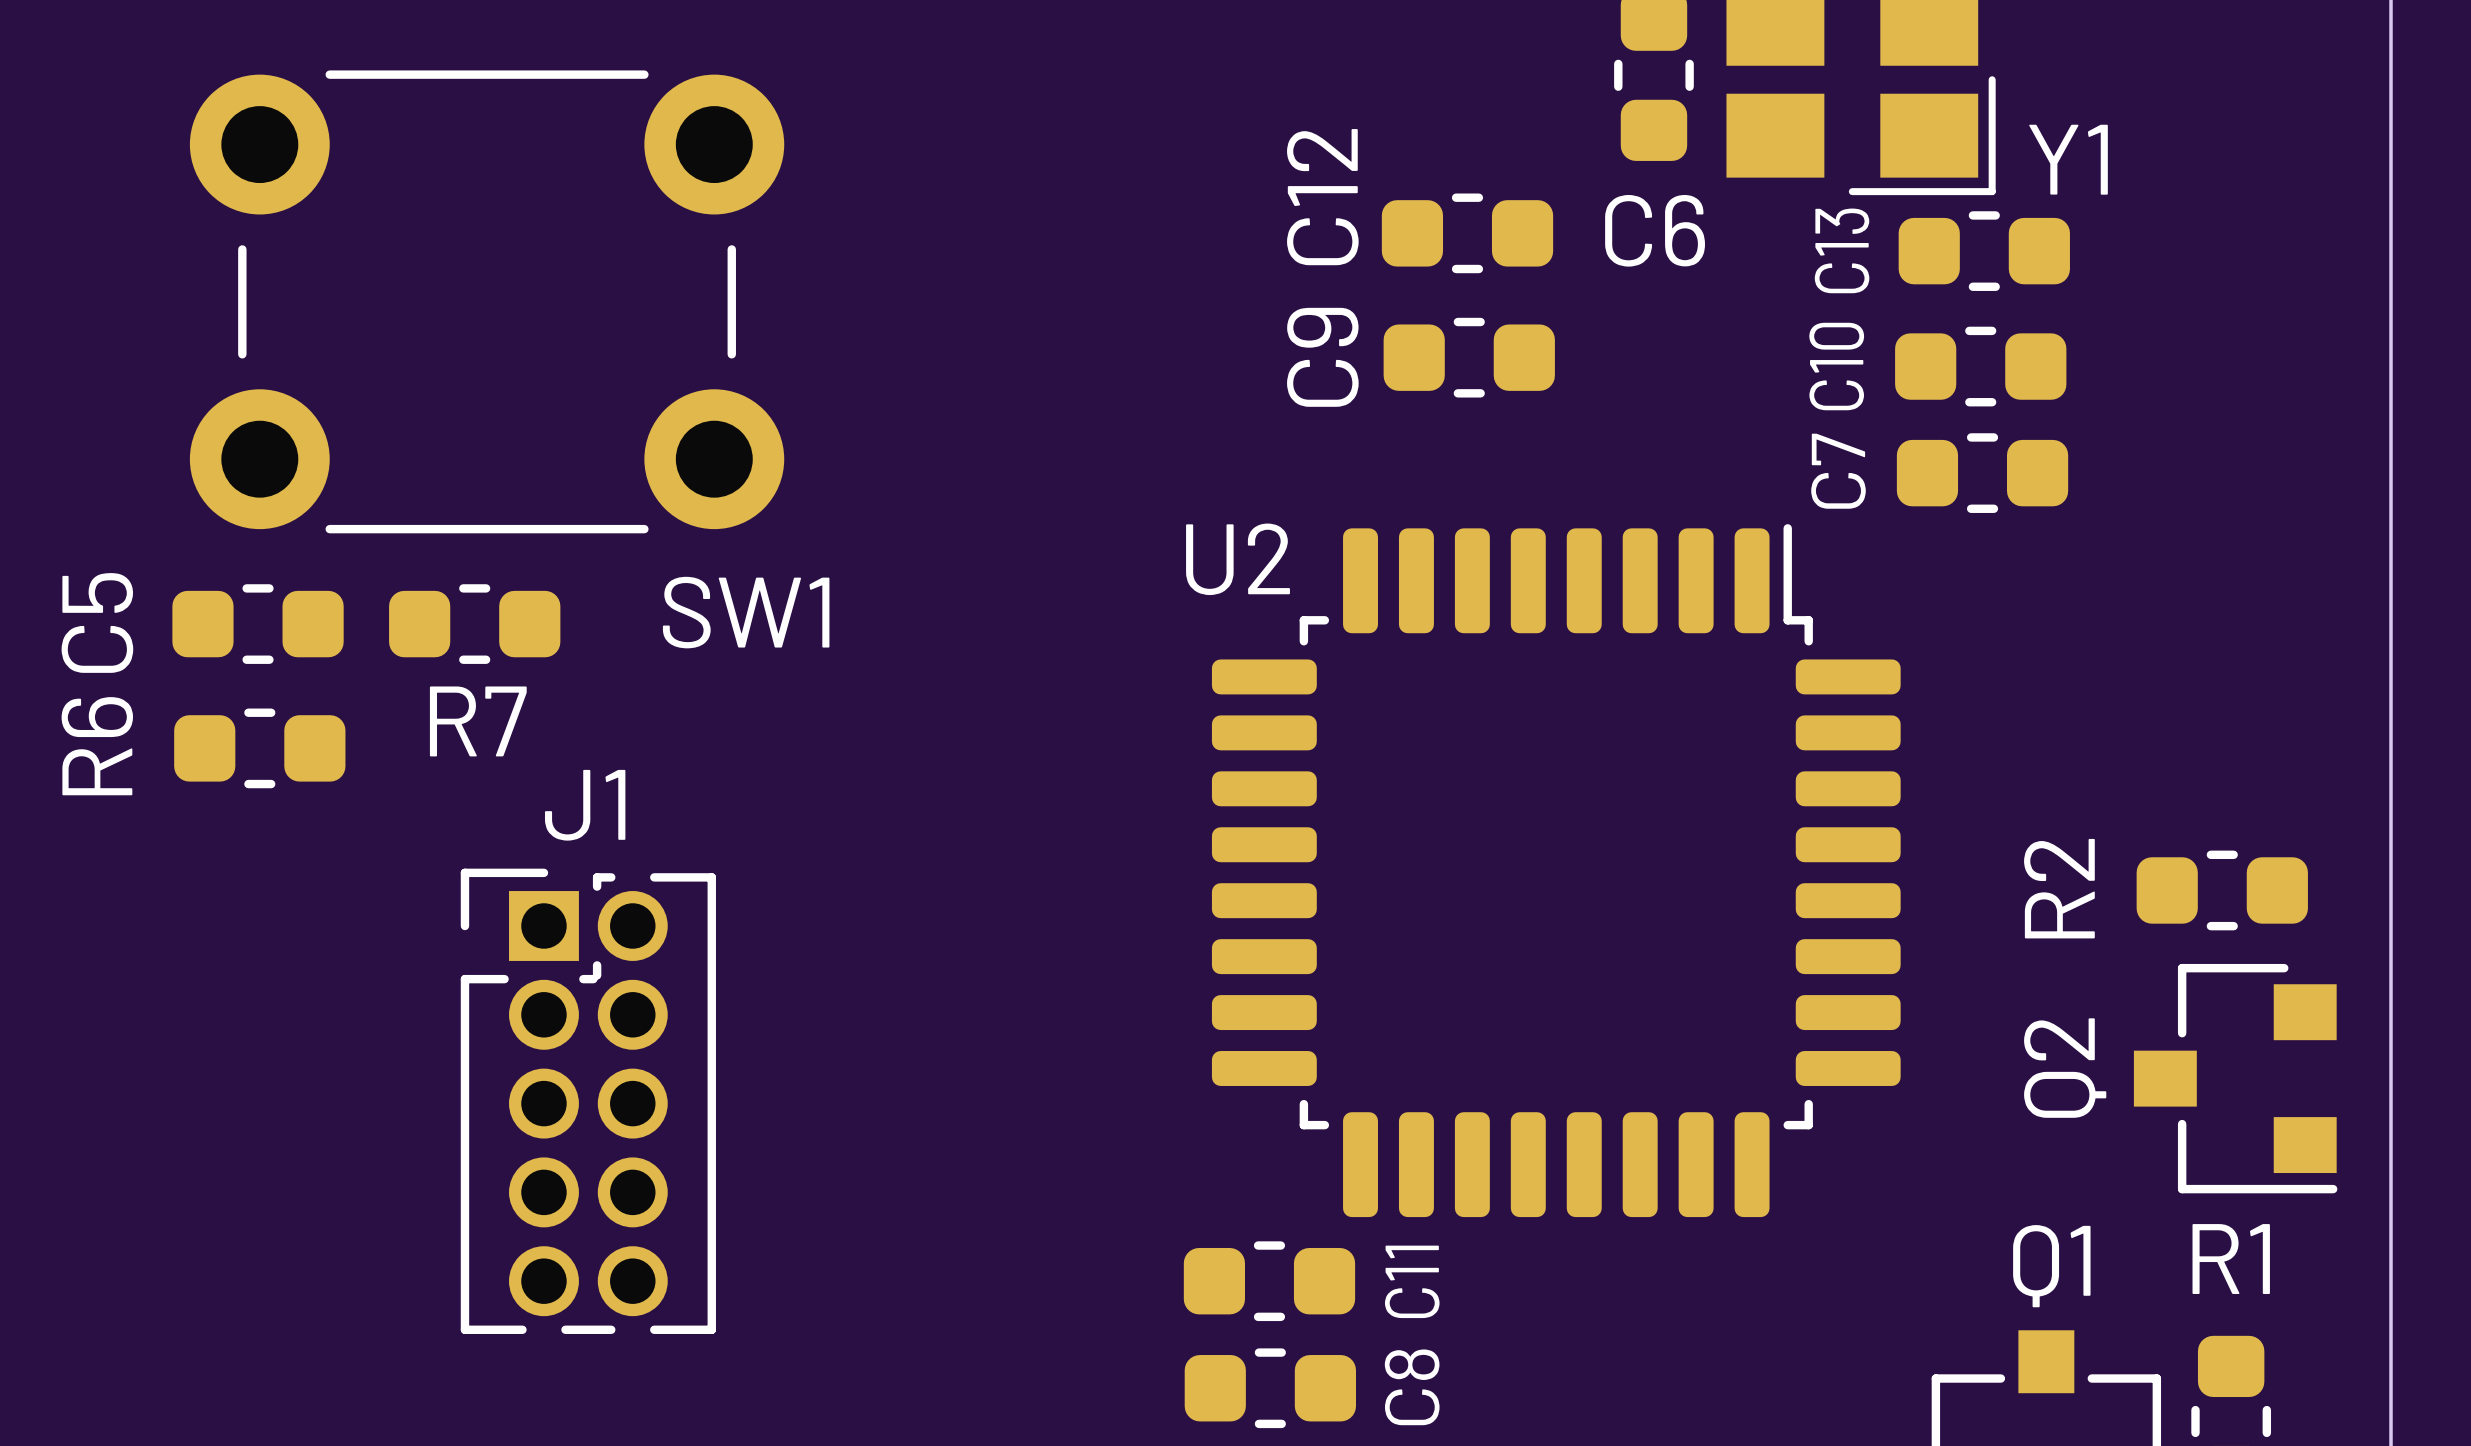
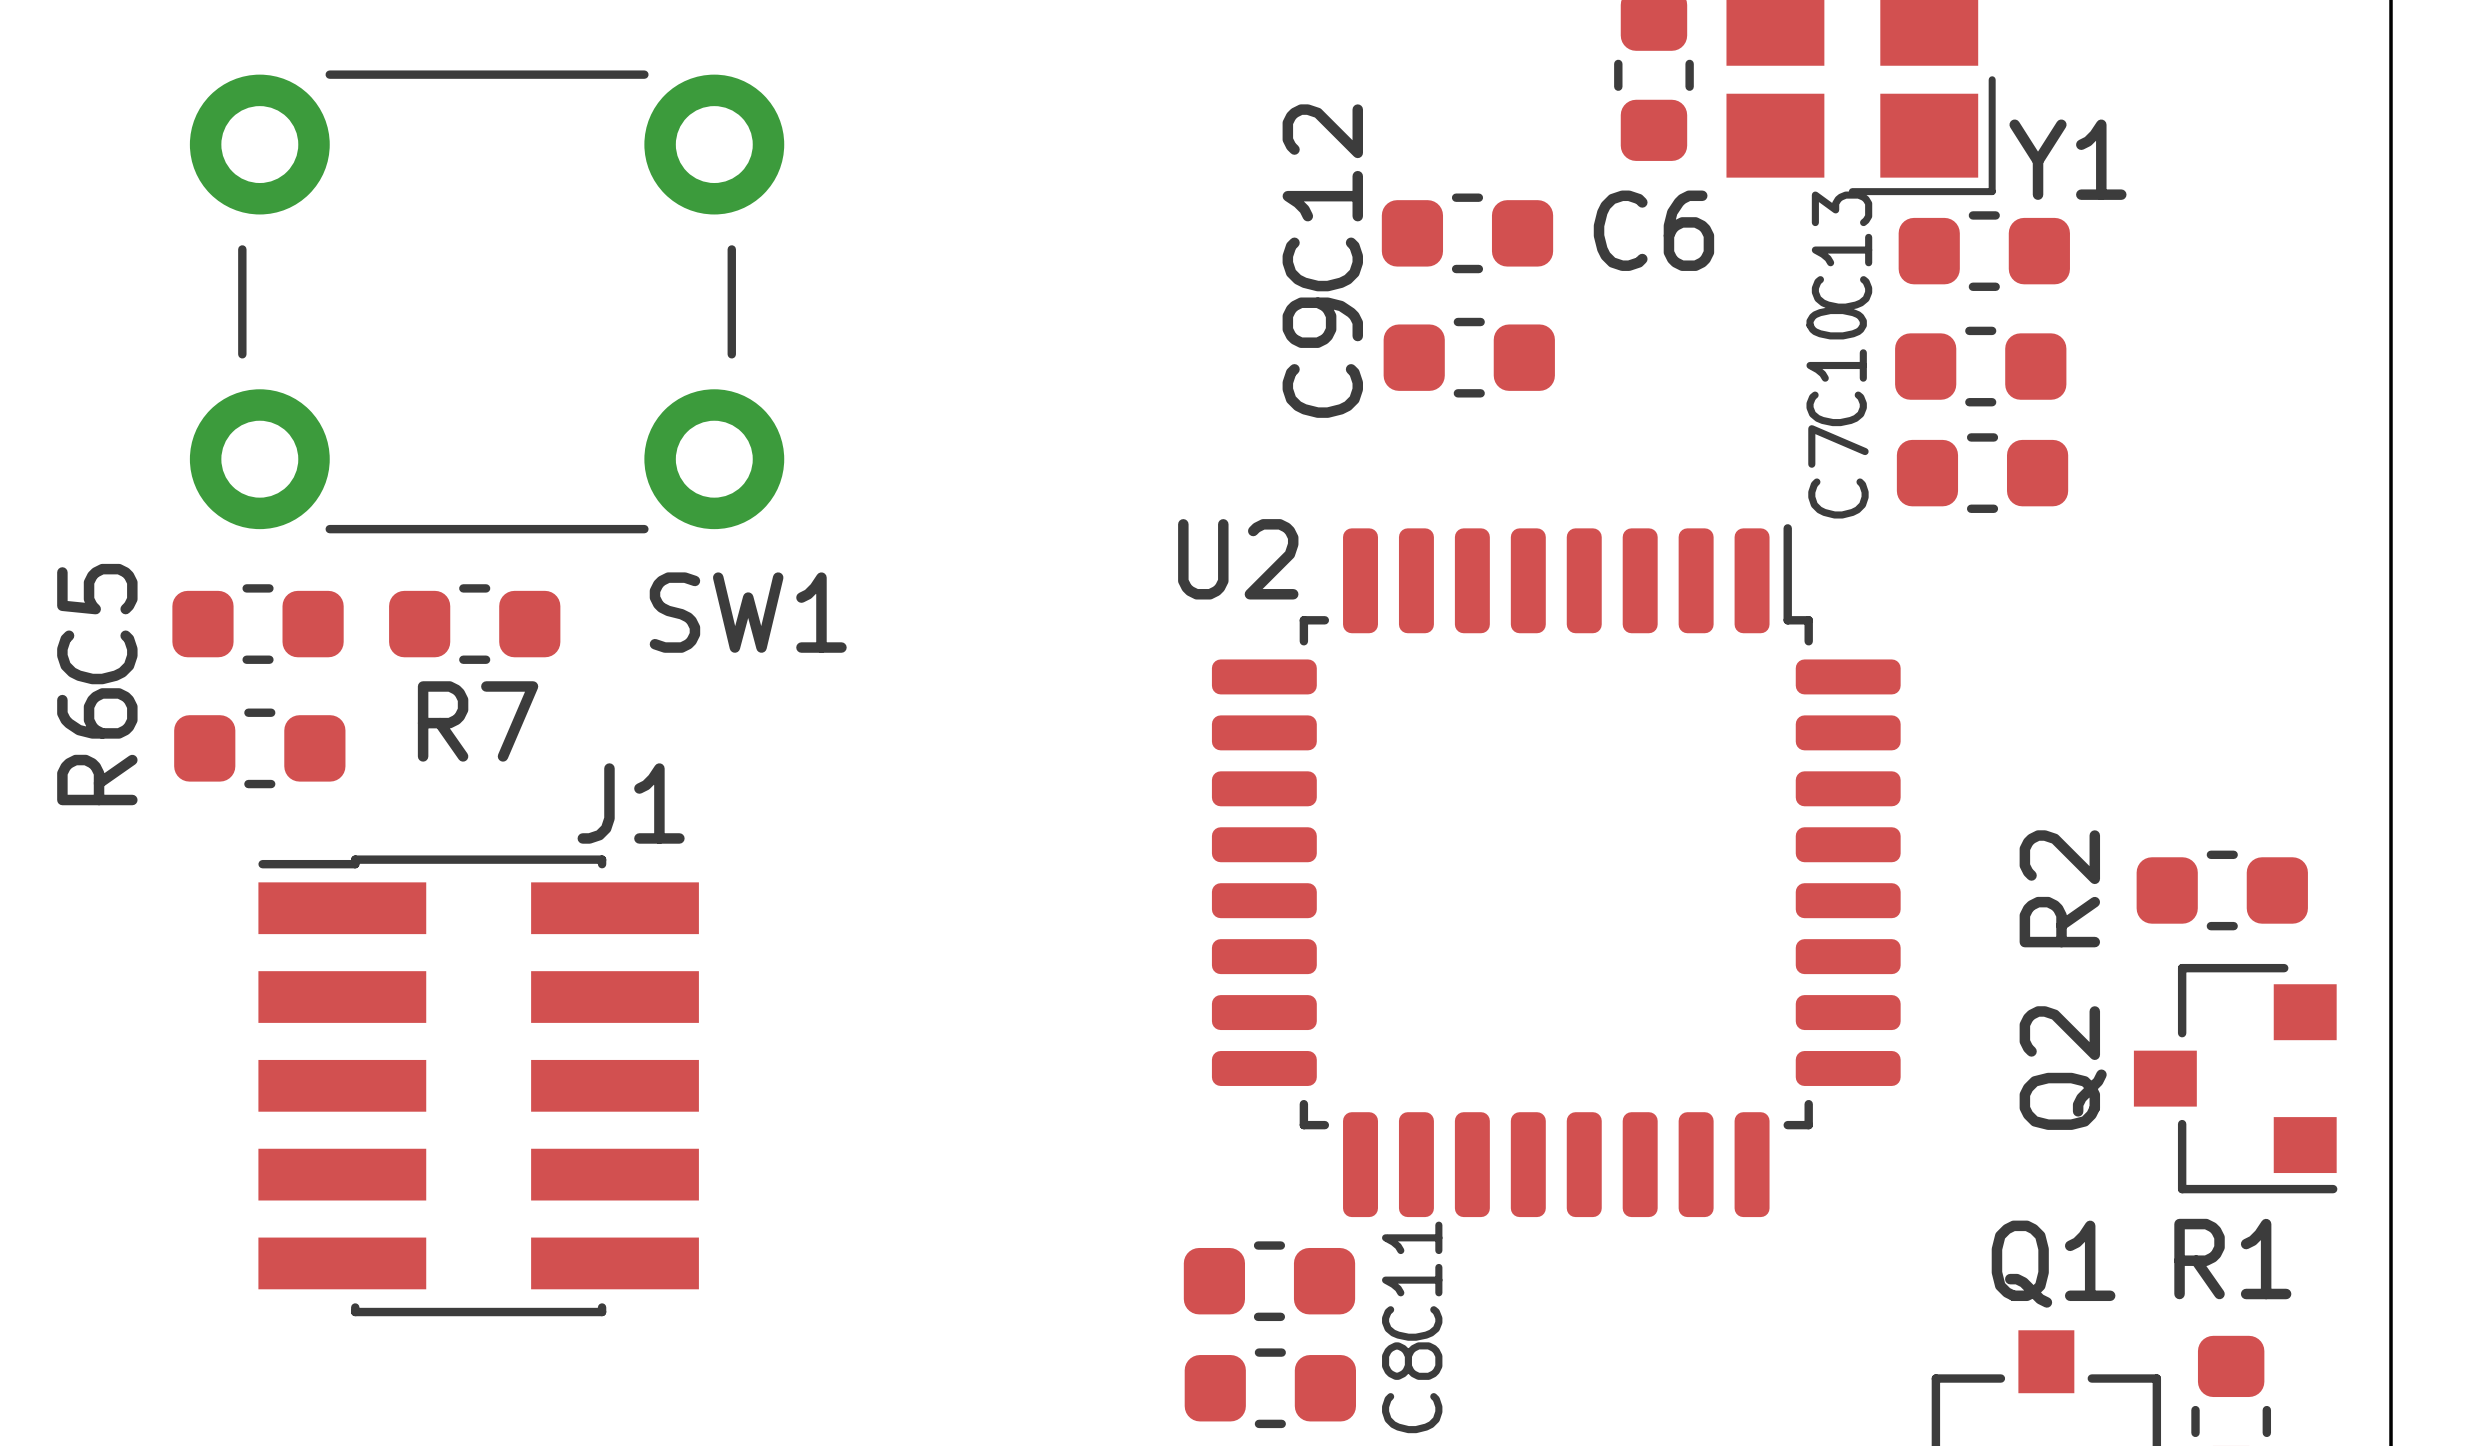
J1 name position: J1 (585, 805) -> J1 (631, 803)
J1 footprint: [460, 868, 716, 1334] -> [258, 855, 699, 1317]

